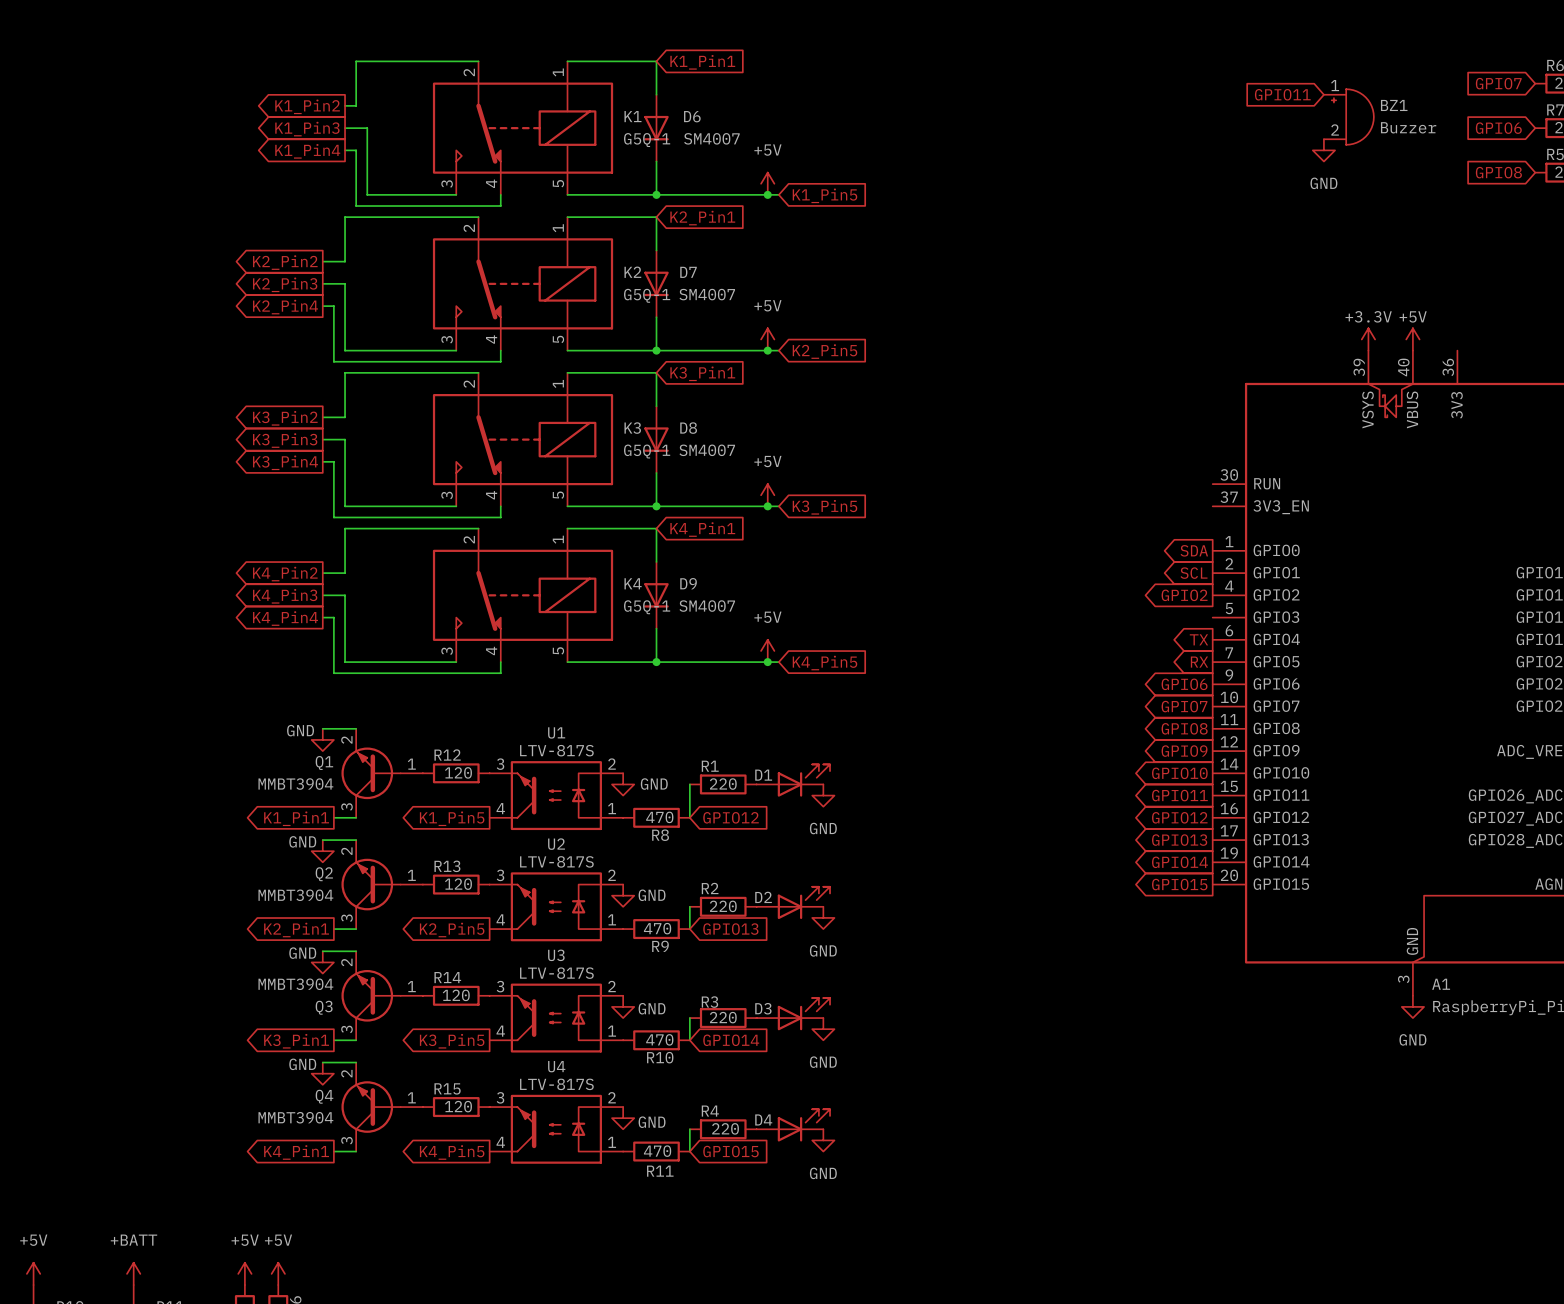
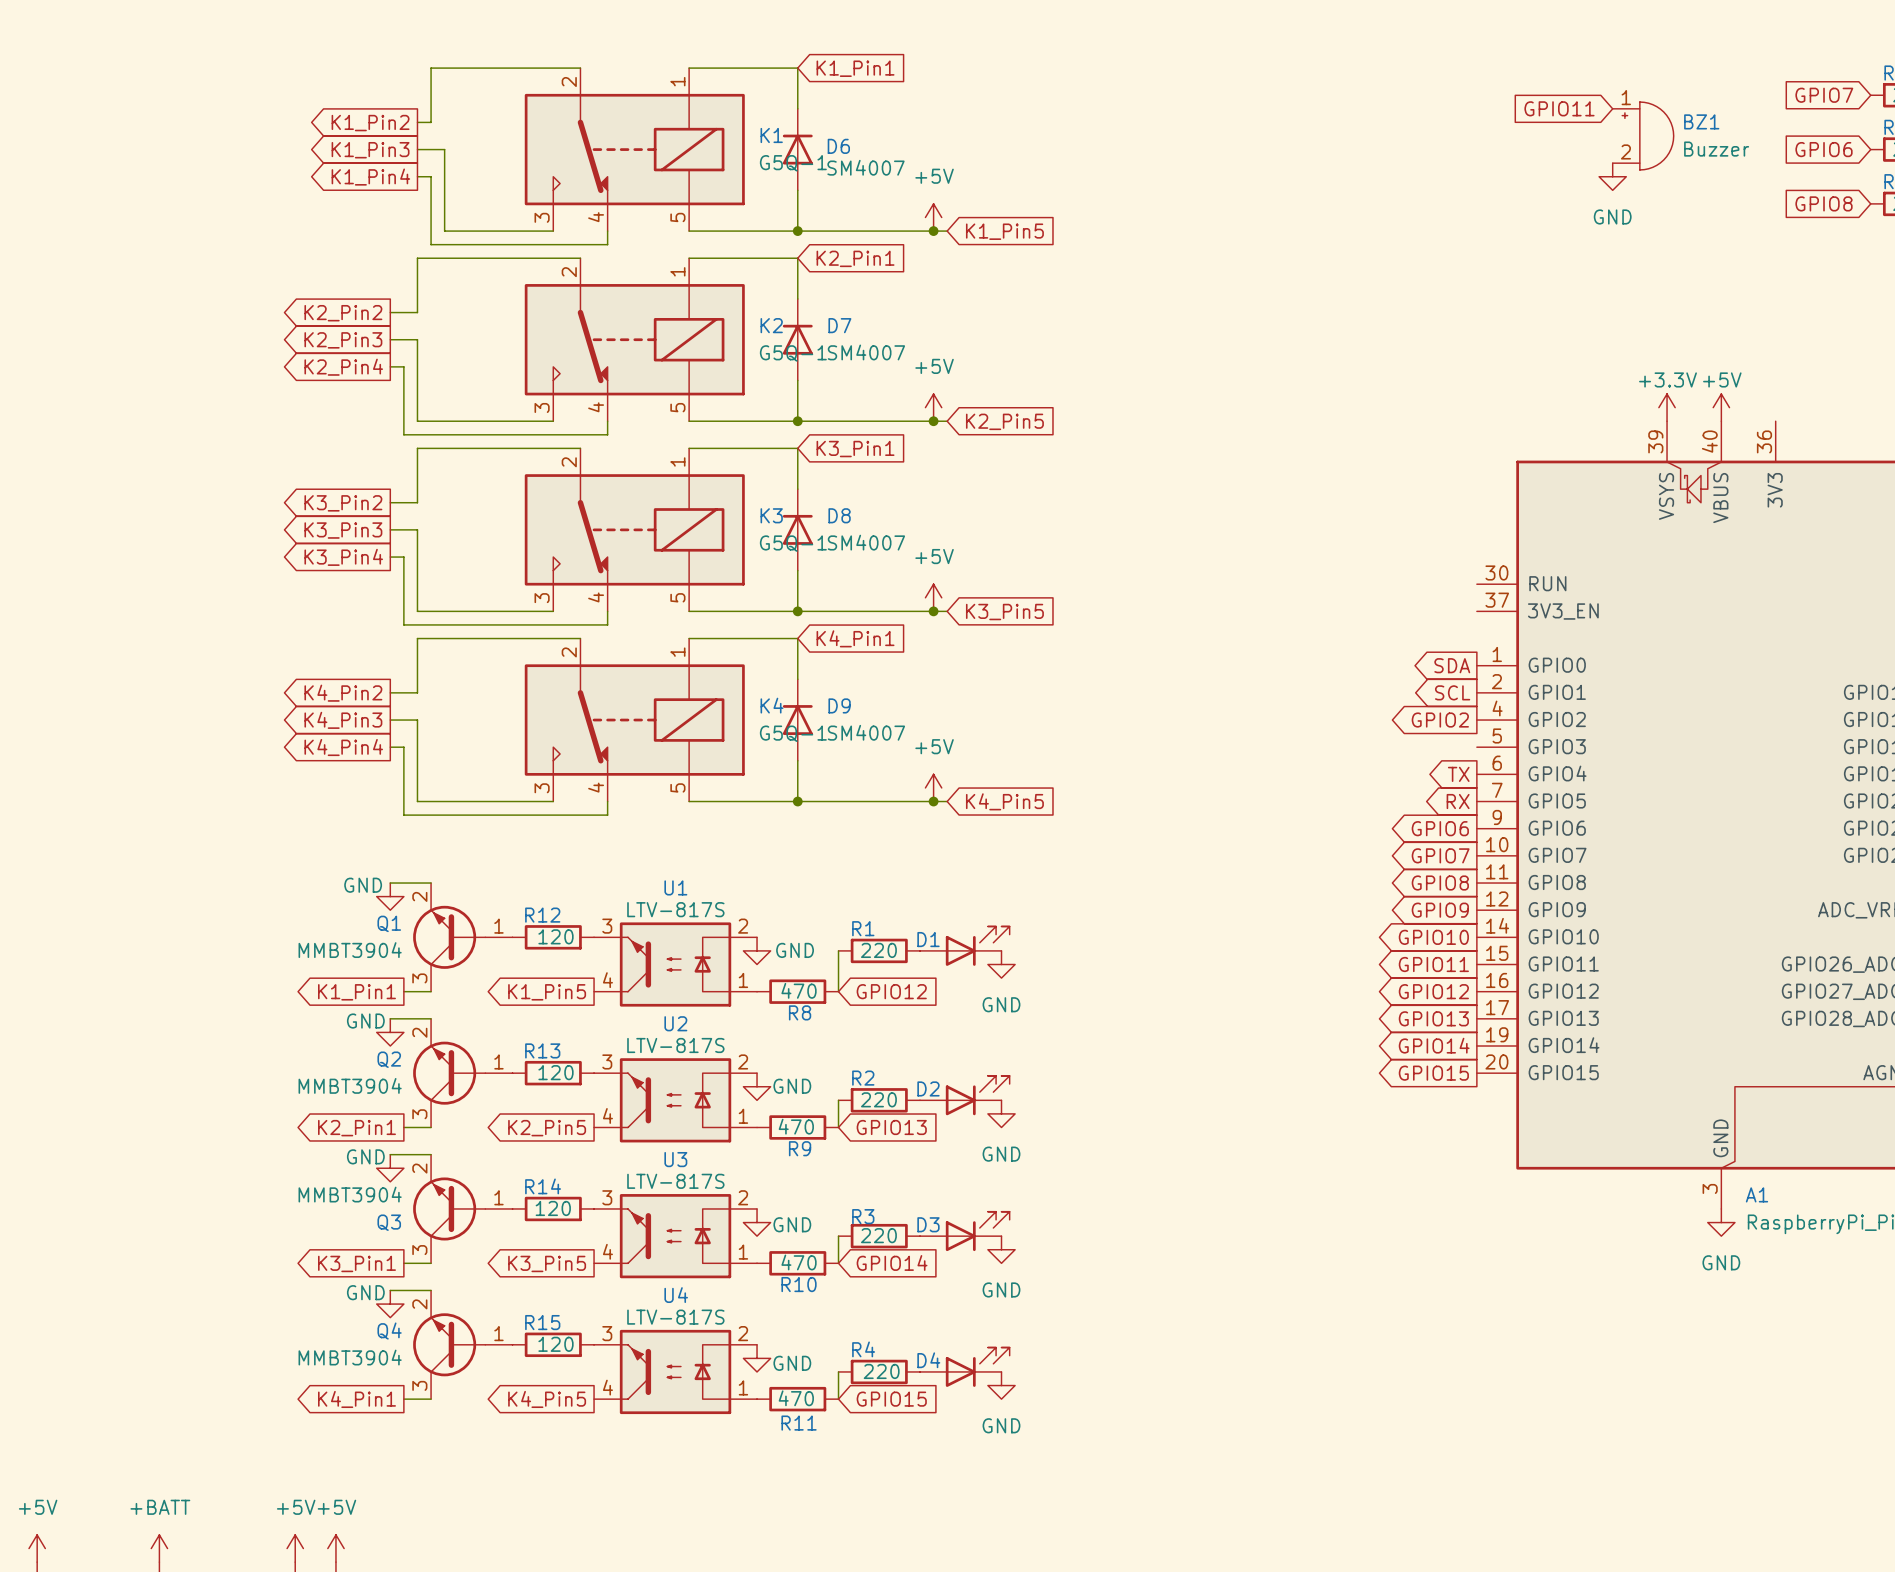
D6 rotation: 0° (656, 128) -> 180° (797, 149)
D7 rotation: 0° (656, 283) -> 180° (797, 339)
D8 rotation: 0° (656, 439) -> 180° (797, 529)
D9 rotation: 0° (656, 595) -> 180° (797, 720)

